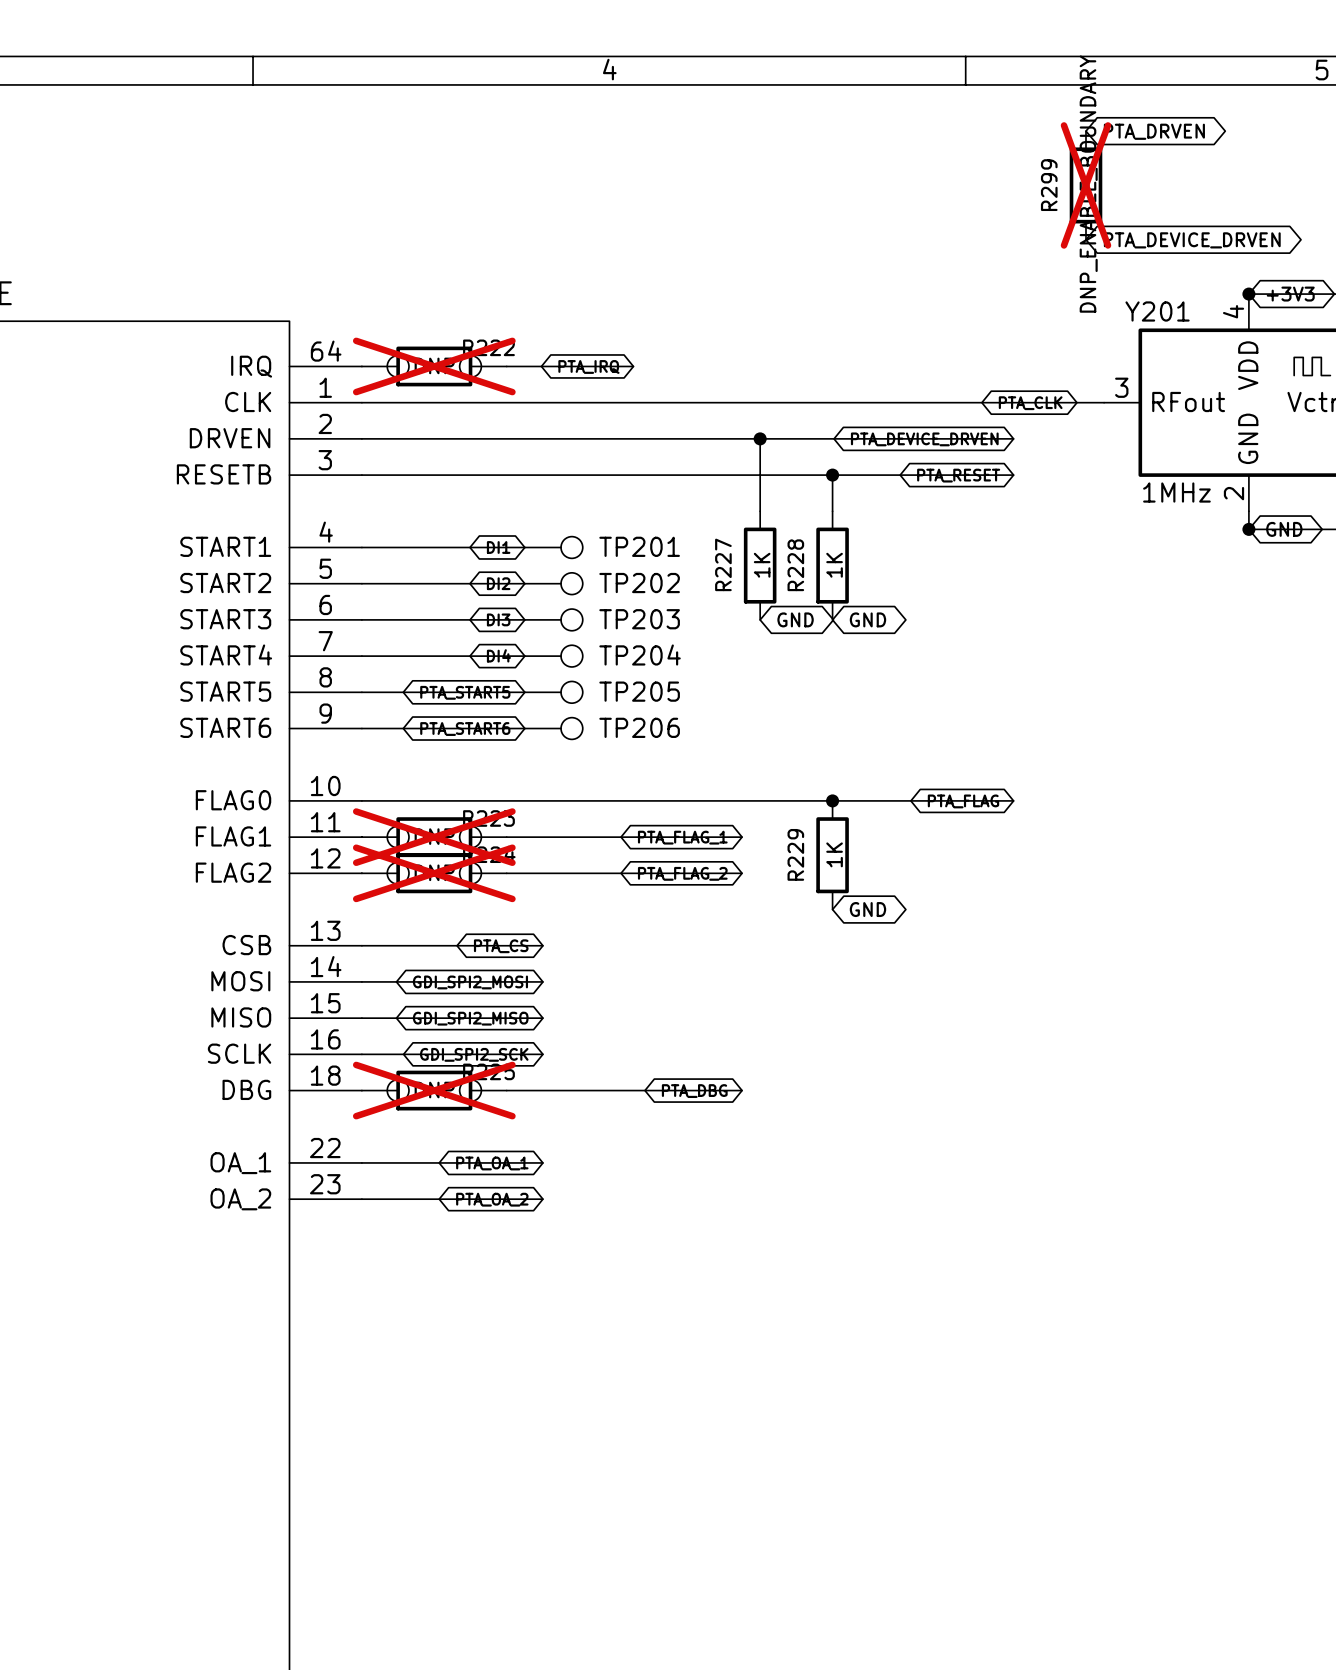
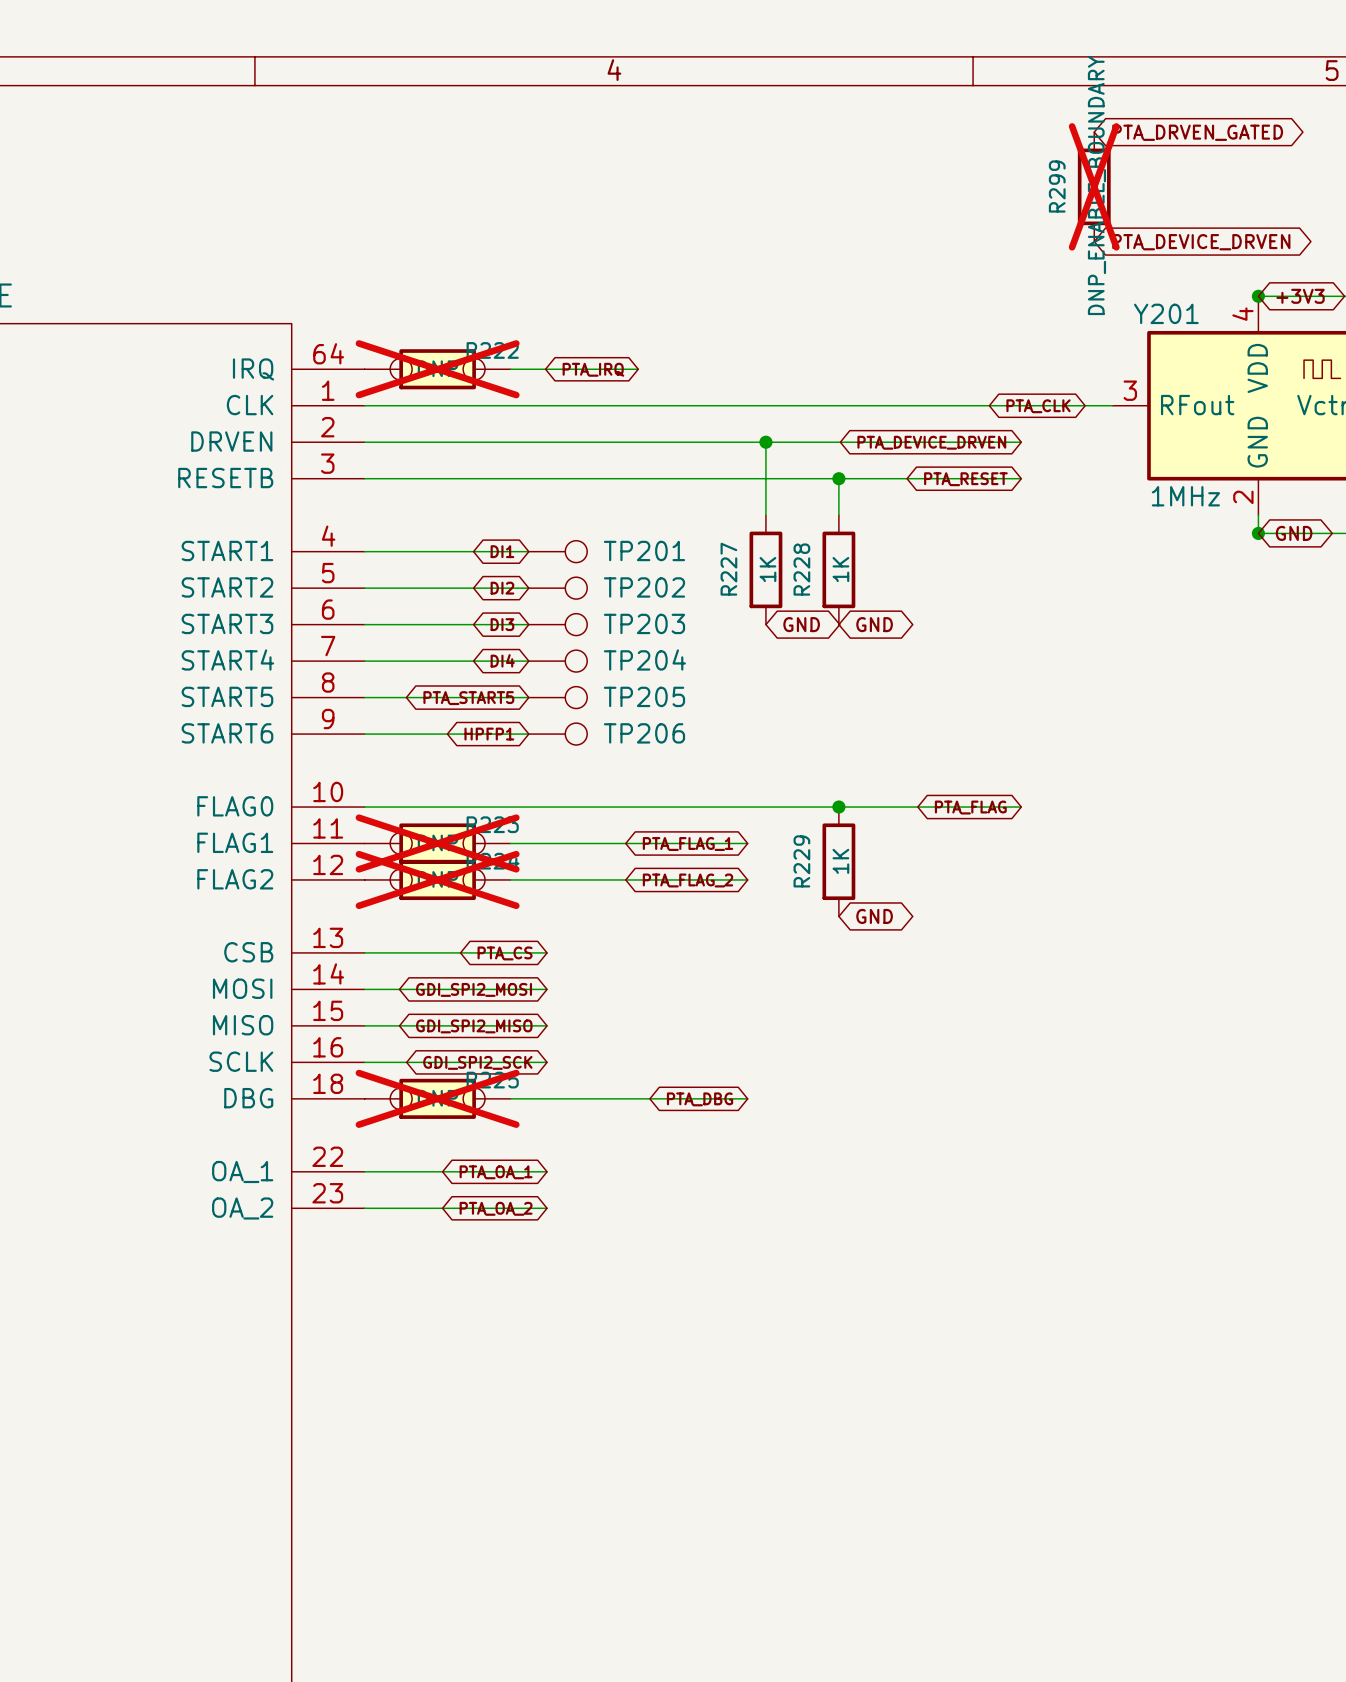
global label: PTA_DRVEN (1154, 131) -> PTA_DRVEN_GATED (1197, 132)
global label: PTA_START6 (465, 729) -> HPFP1 (489, 734)

